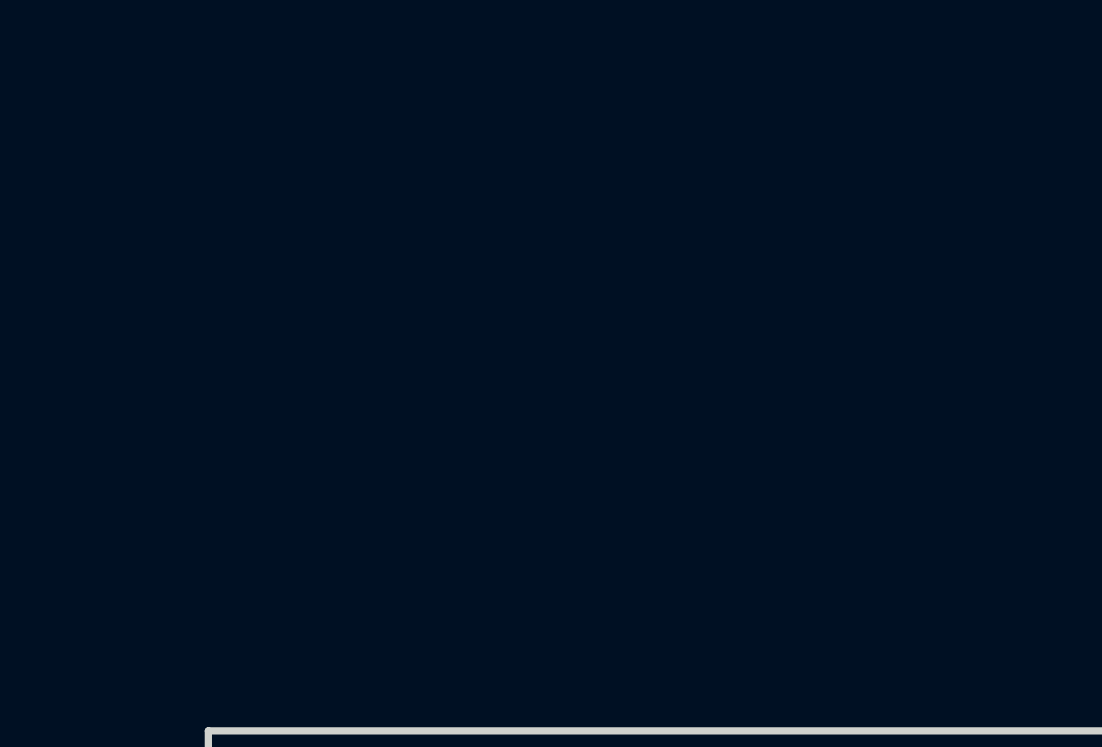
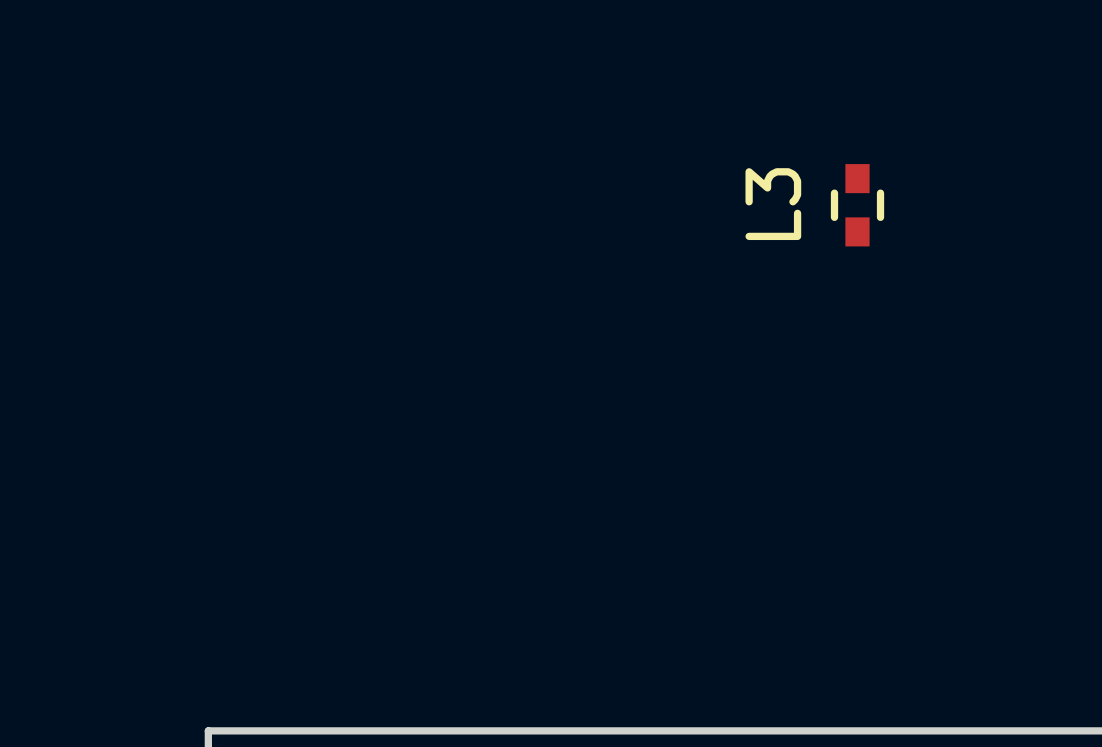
L3: none -> (857, 205)

